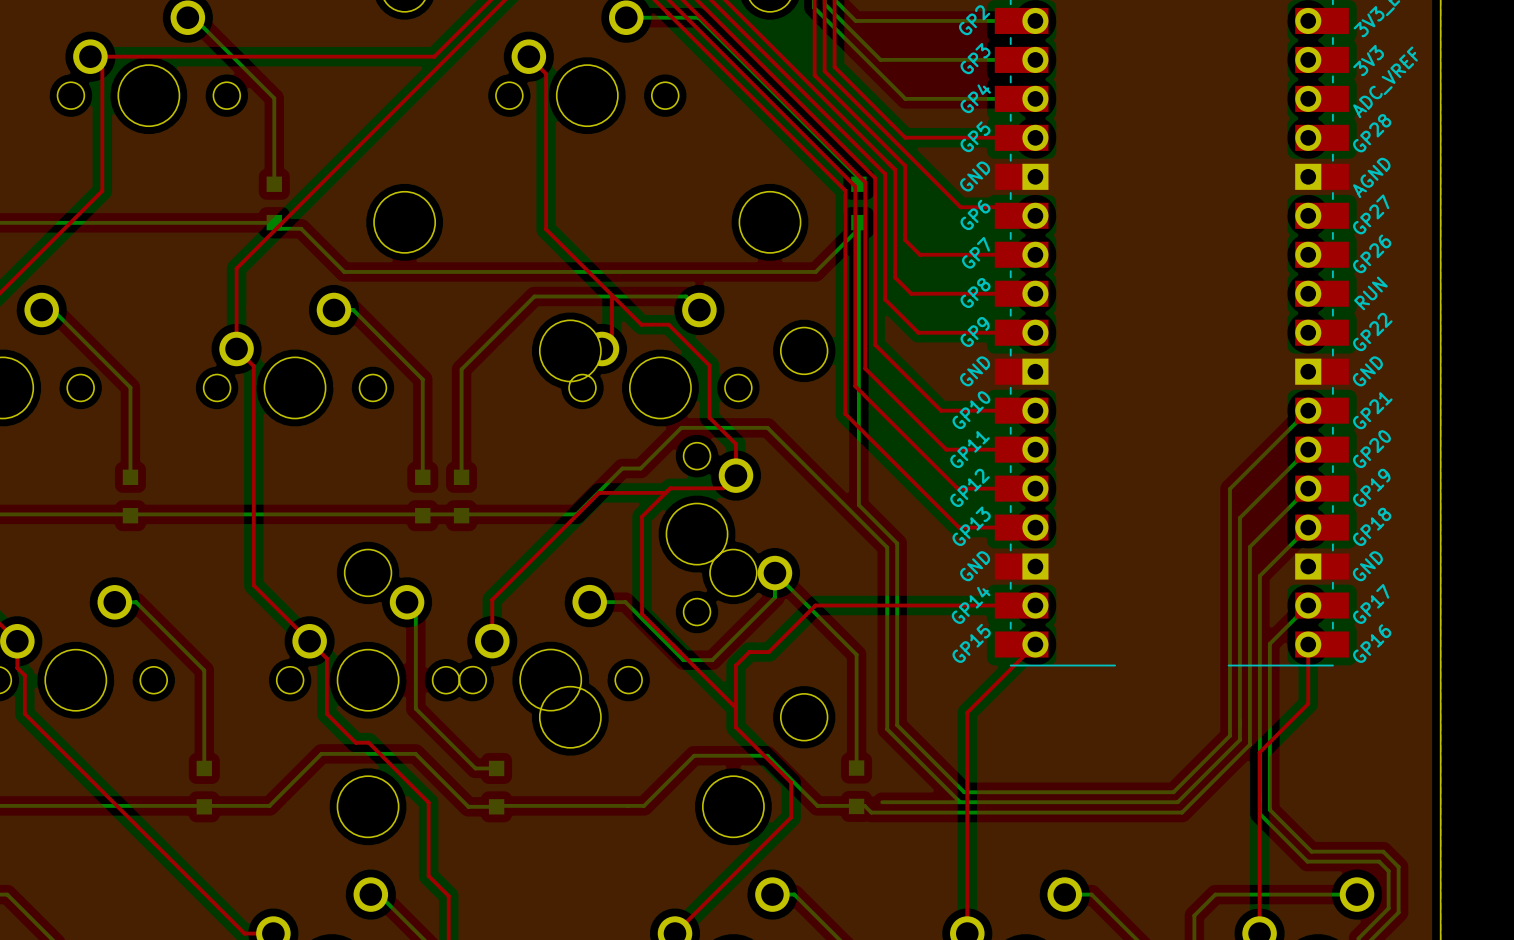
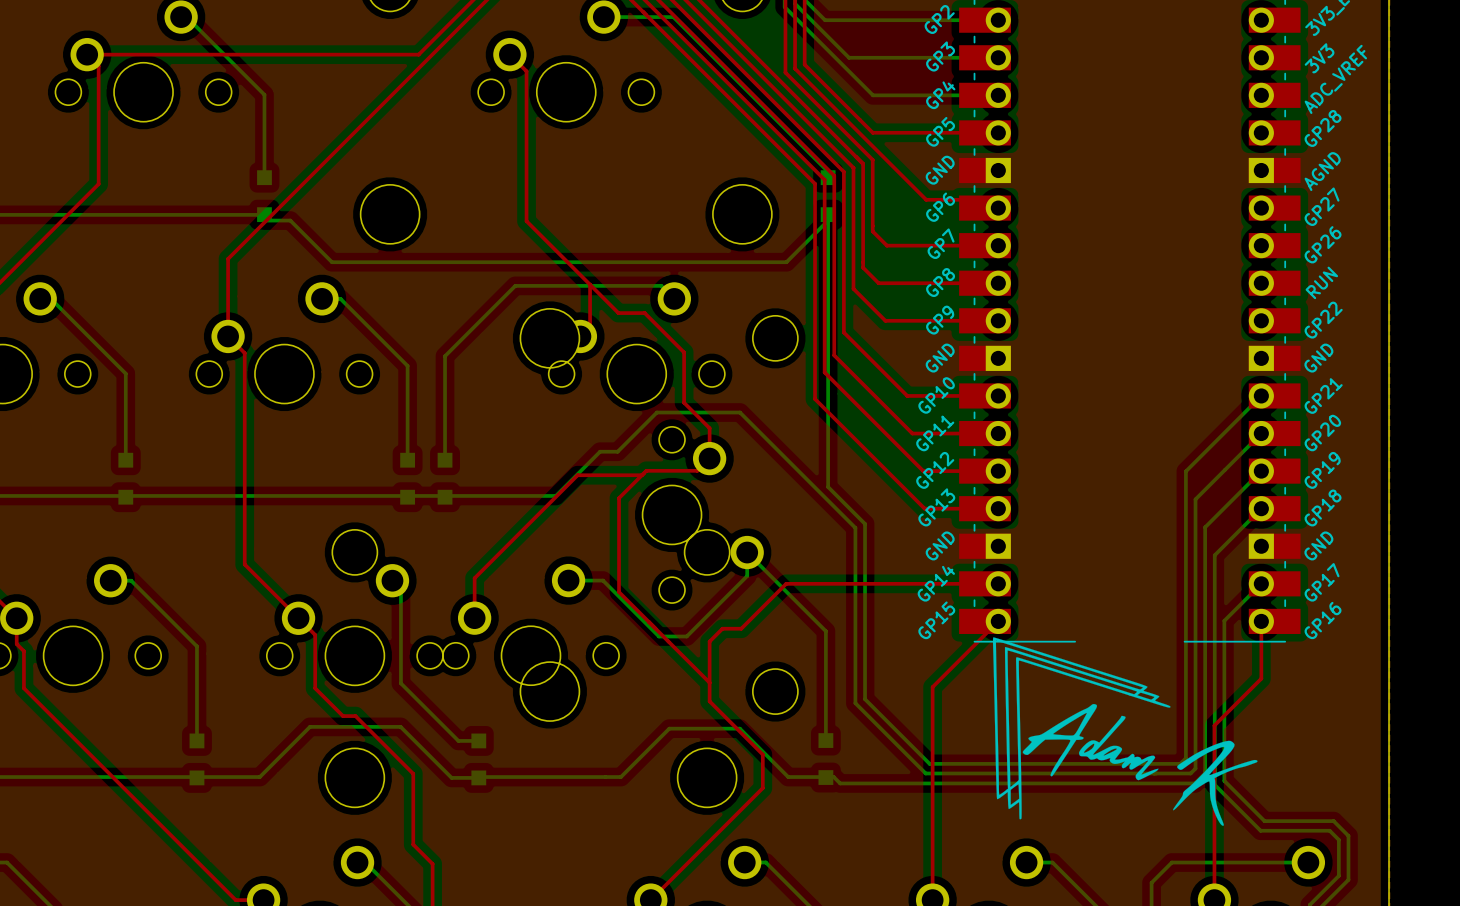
drawing: none -> [992, 637, 1258, 826]
bottom track: (1229, 735) (1173, 792) -> (1185, 709) (1185, 758) (1180, 763) (1131, 763)
bottom track: (1239, 739) (1177, 802) -> (1195, 713) (1195, 768) (1190, 773) (1135, 773)
bottom track: (1249, 744) (1182, 812) -> (1205, 718) (1205, 773) (1195, 783) (1139, 783)
bottom track: (882, 802) (960, 802) -> none

